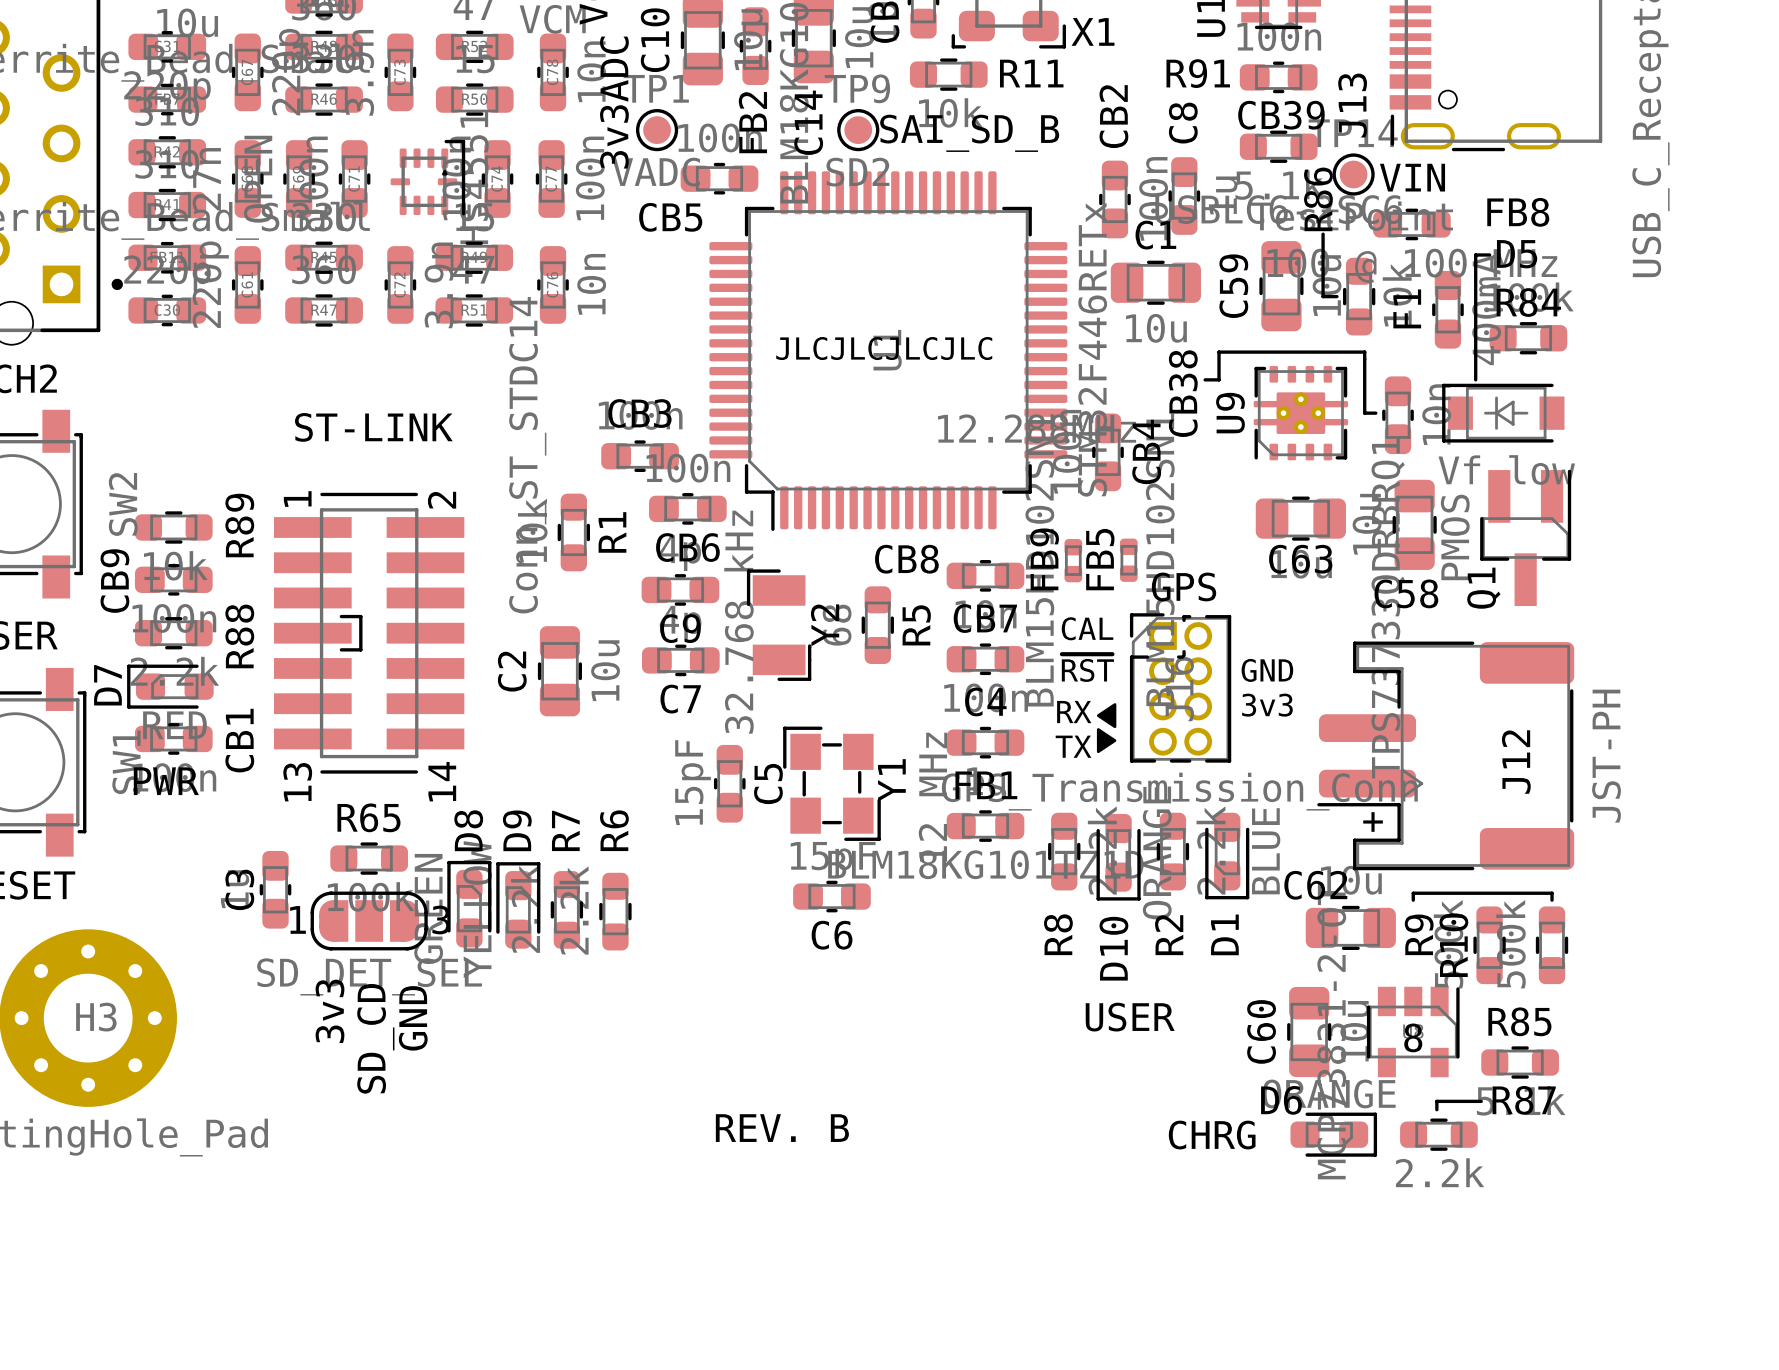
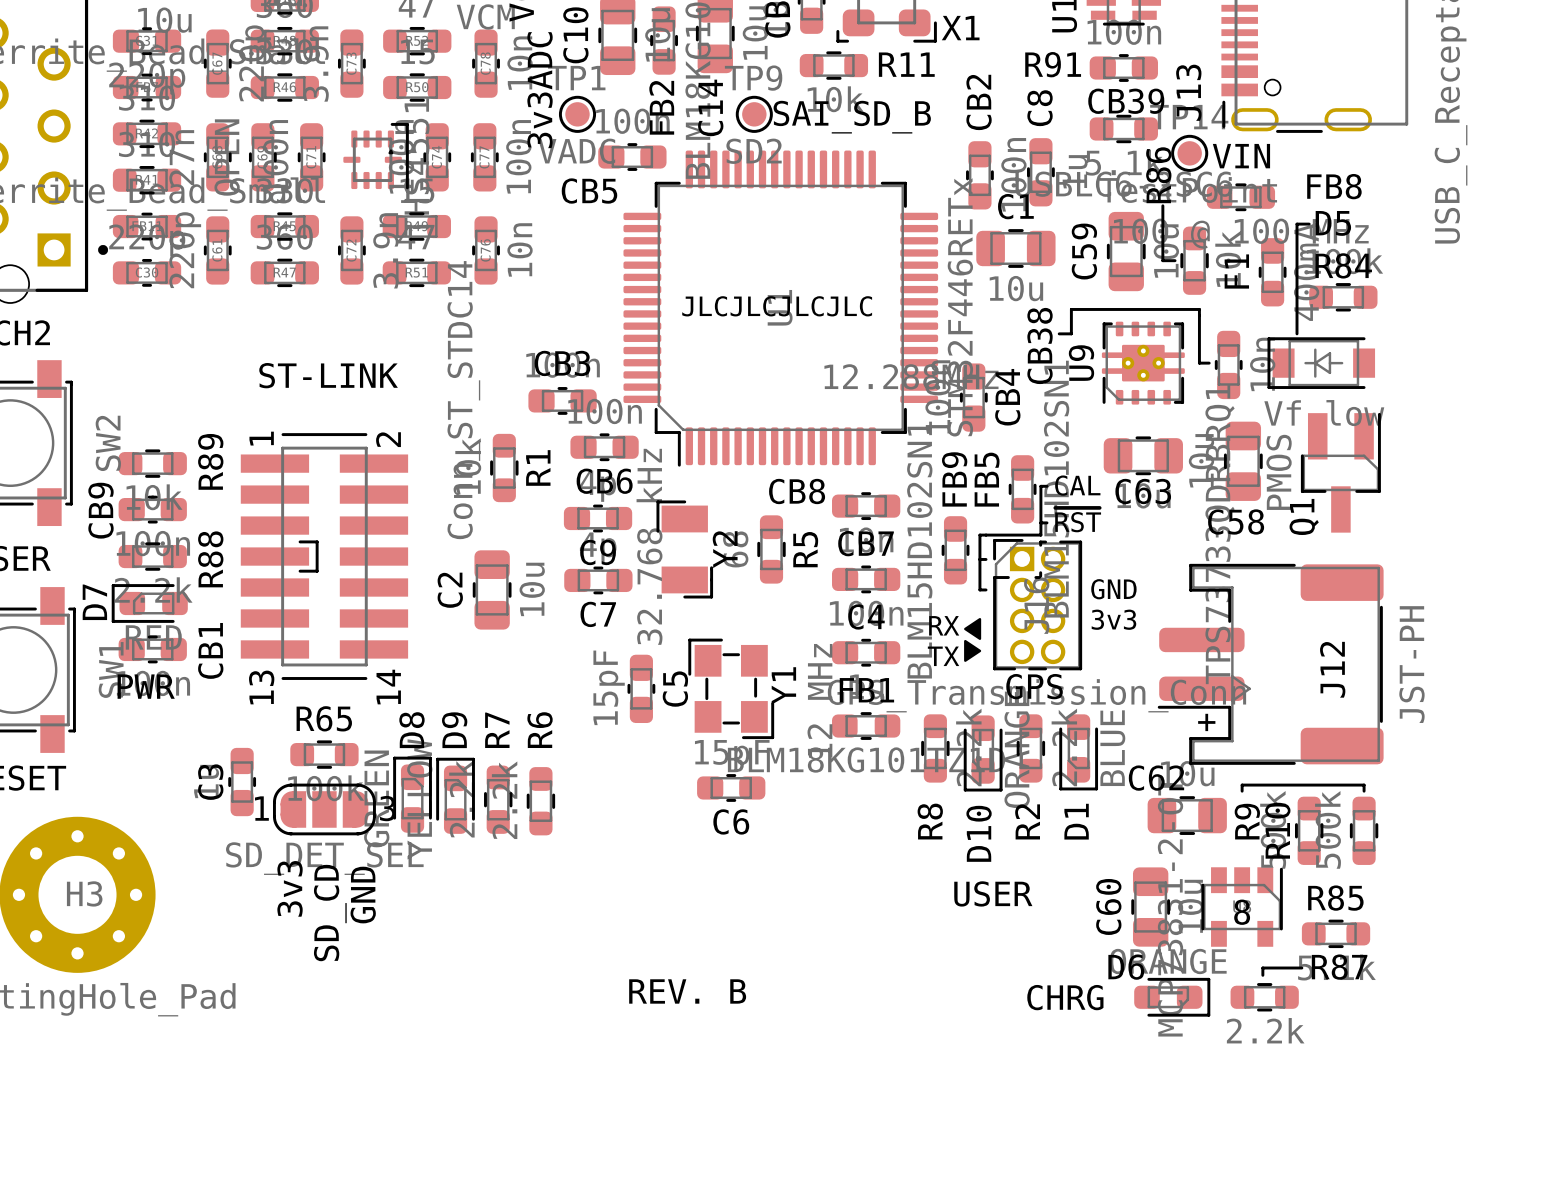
FB5 footprint: [1119, 538, 1138, 582] -> [1008, 455, 1037, 524]
FB9 footprint: [1064, 539, 1083, 583] -> [941, 516, 970, 585]
line: none -> (1047, 486) (1040, 486) (1040, 535) (979, 535) (979, 589) (986, 589)
FB9 name position: FB9 (1044, 559) -> FB9 (954, 479)
text position: GPS (1184, 586) -> GPS (1034, 686)
line: none -> (1040, 522) (1047, 522)
text position: CAL (1087, 628) -> CAL (1077, 485)
line: none -> (979, 559) (986, 559)
text position: ~{RST} (1087, 668) -> ~{RST} (1078, 520)

